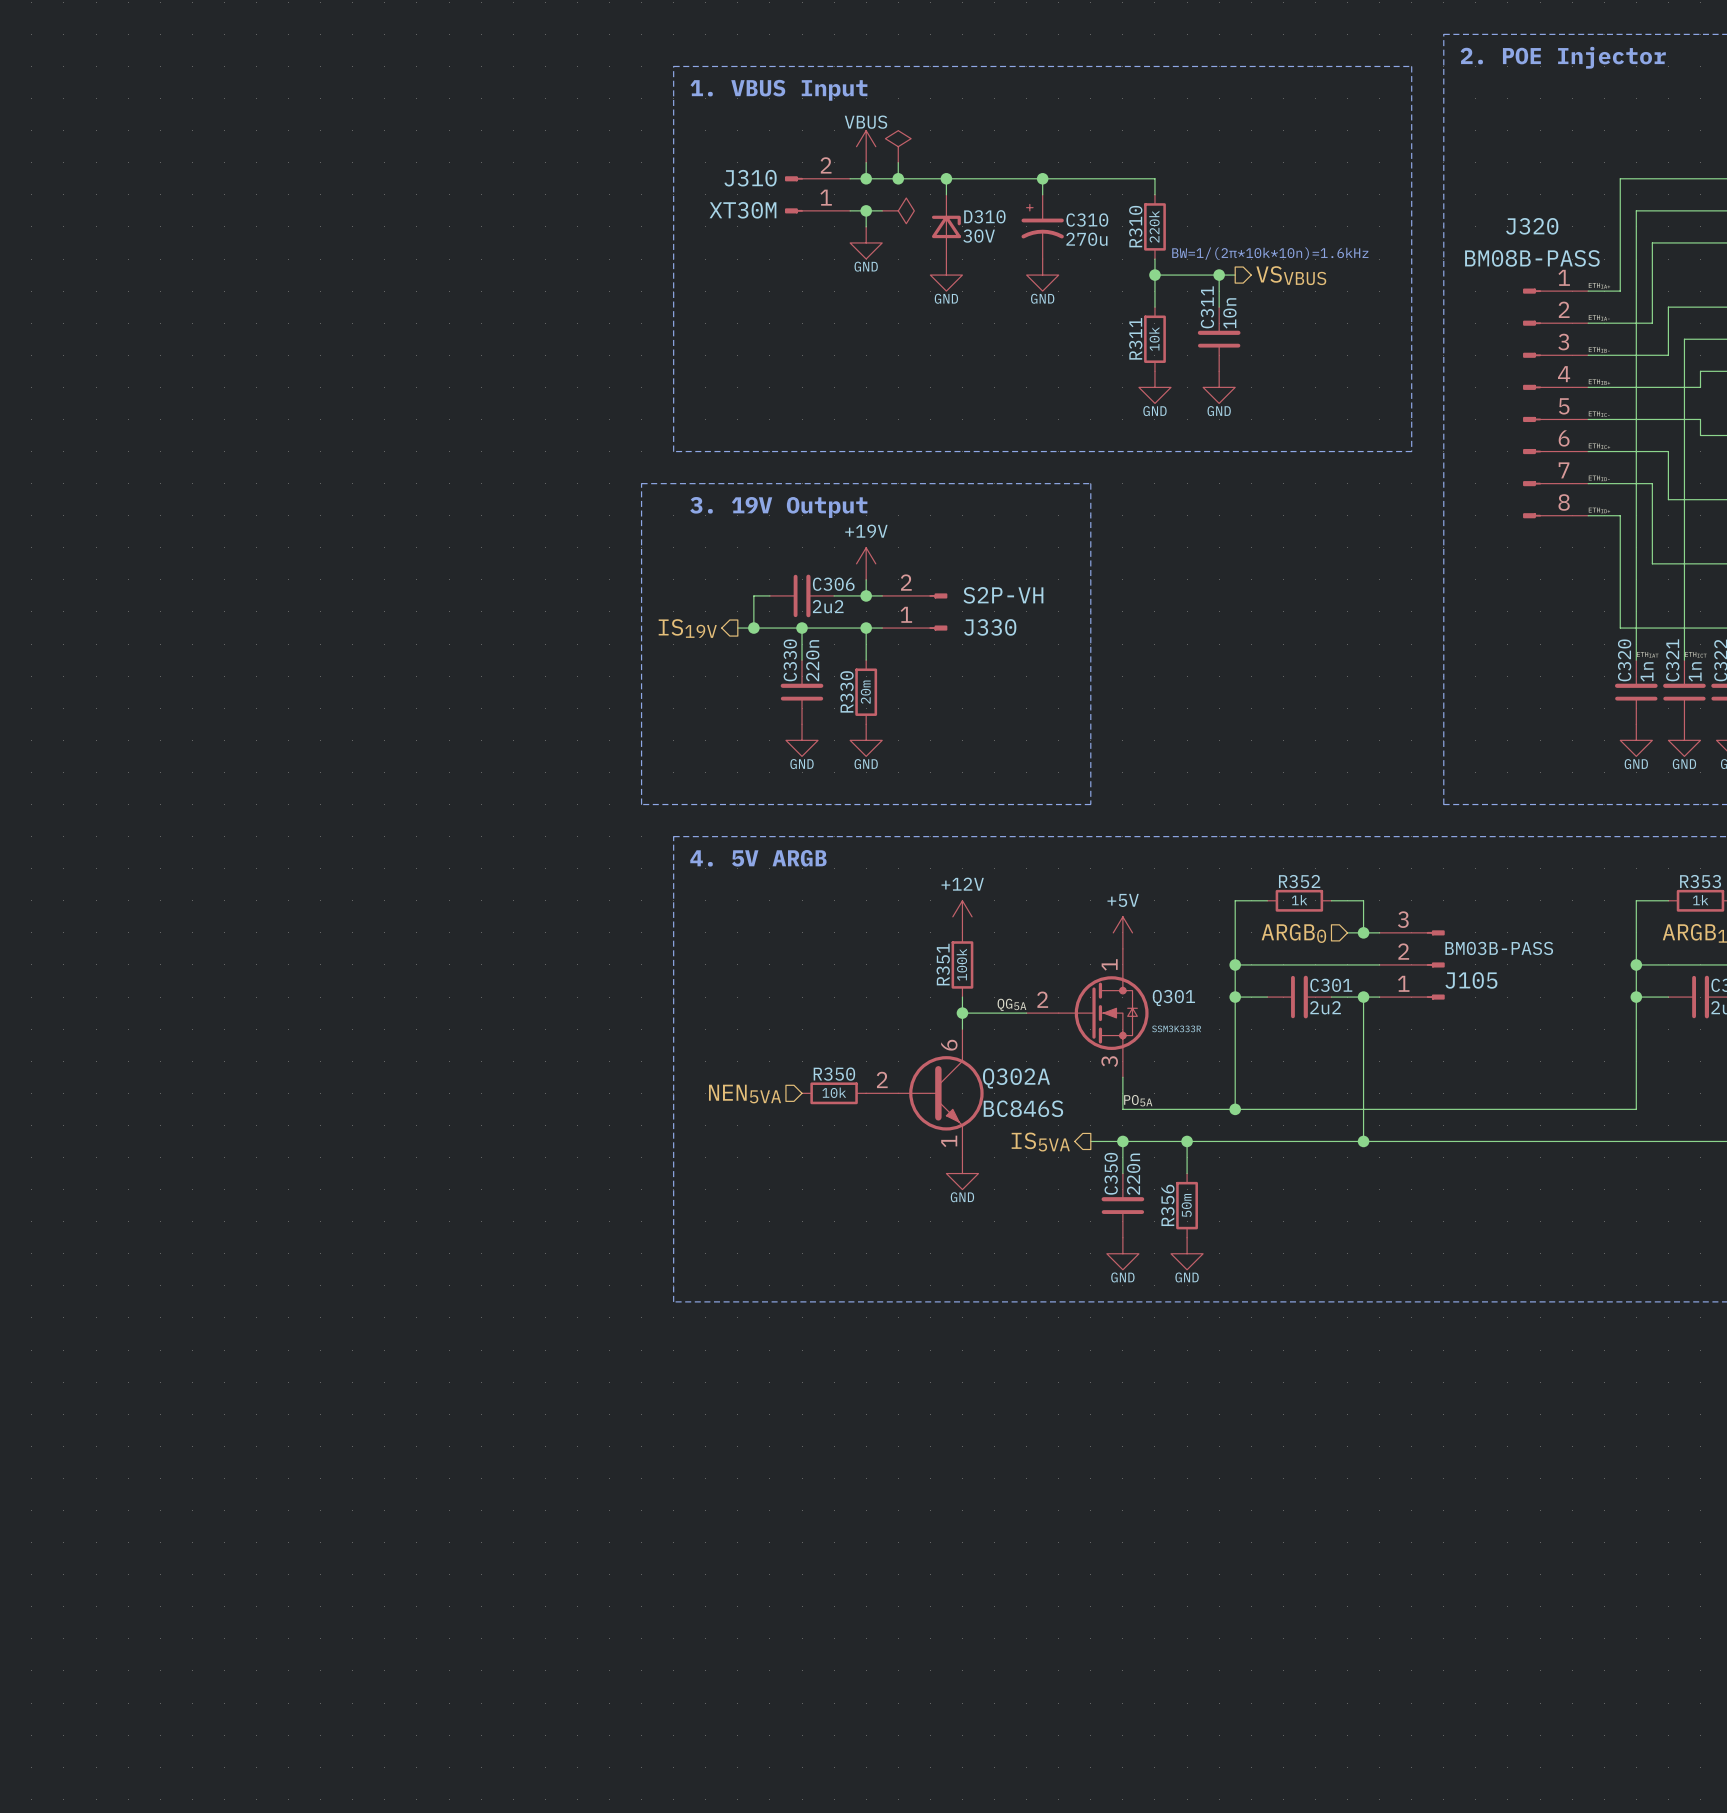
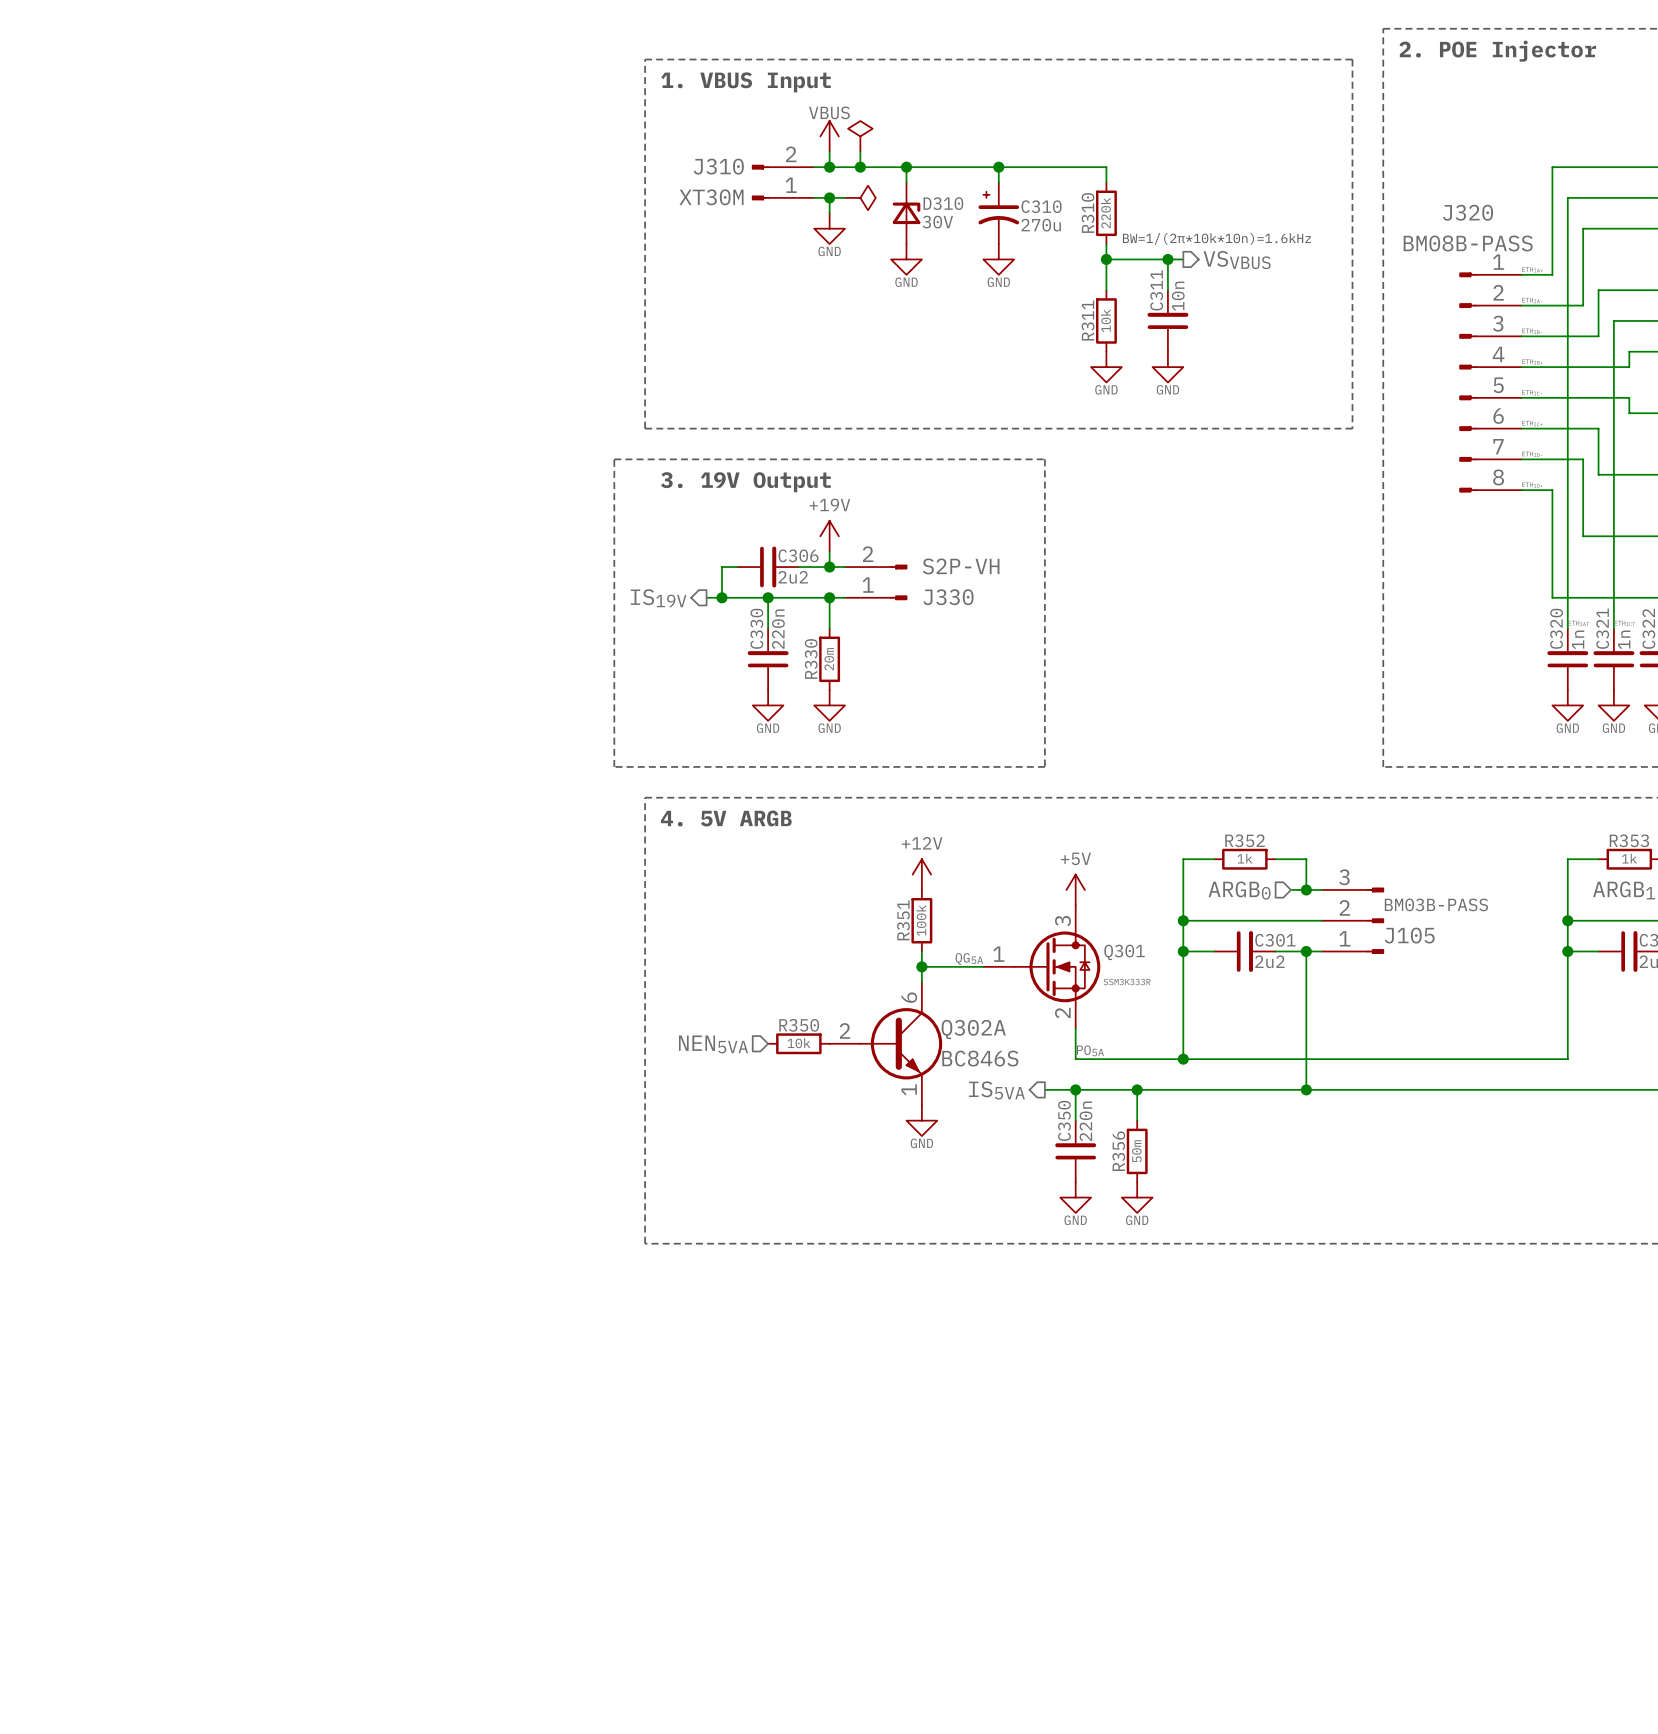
Q301 pin number: 1 (1109, 964) -> 3 (1062, 921)
Q301 pin number: 2 (1042, 999) -> 1 (998, 954)
Q301 pin number: 3 (1109, 1061) -> 2 (1062, 1012)

